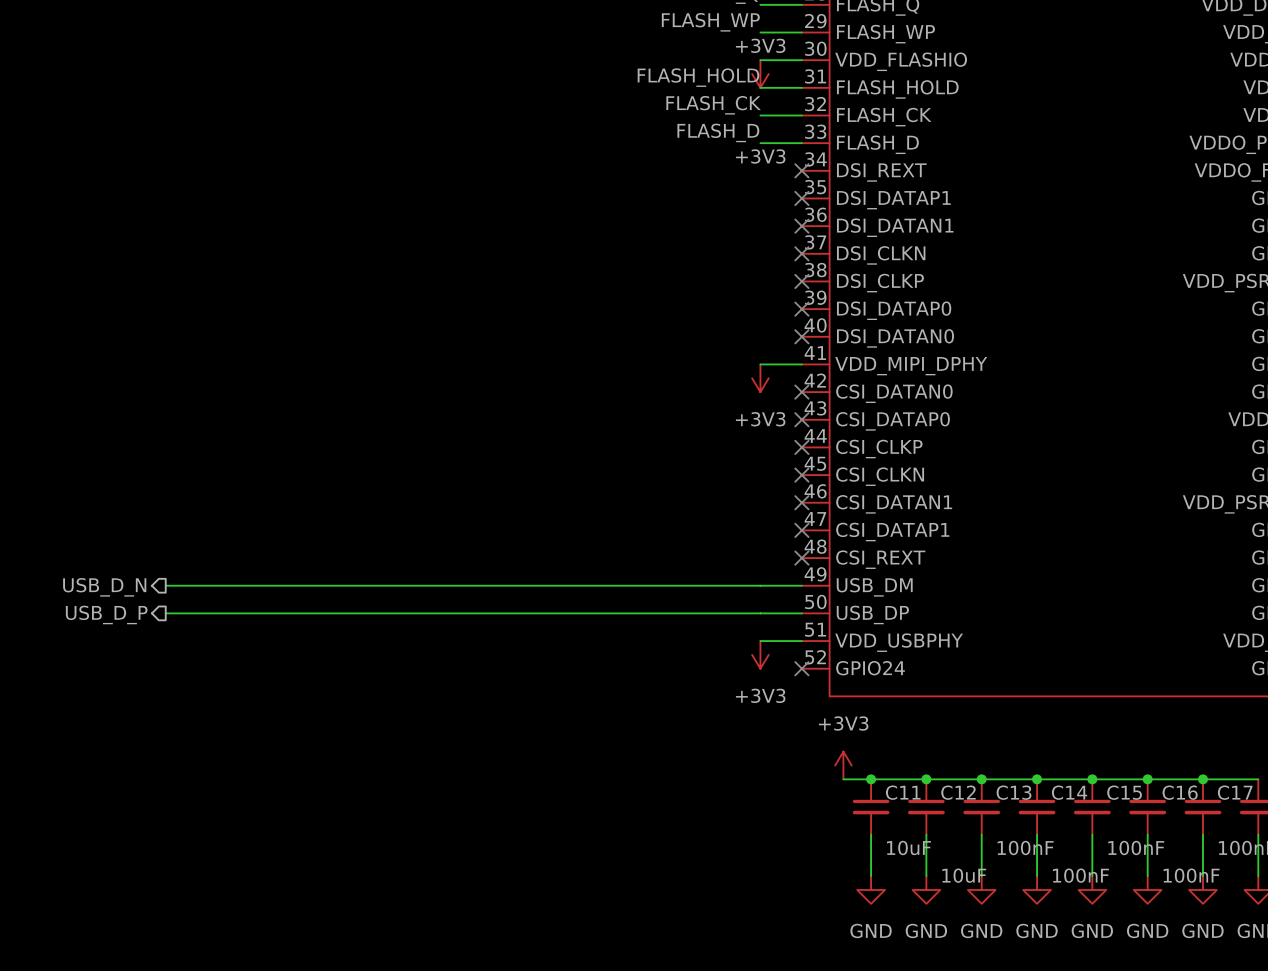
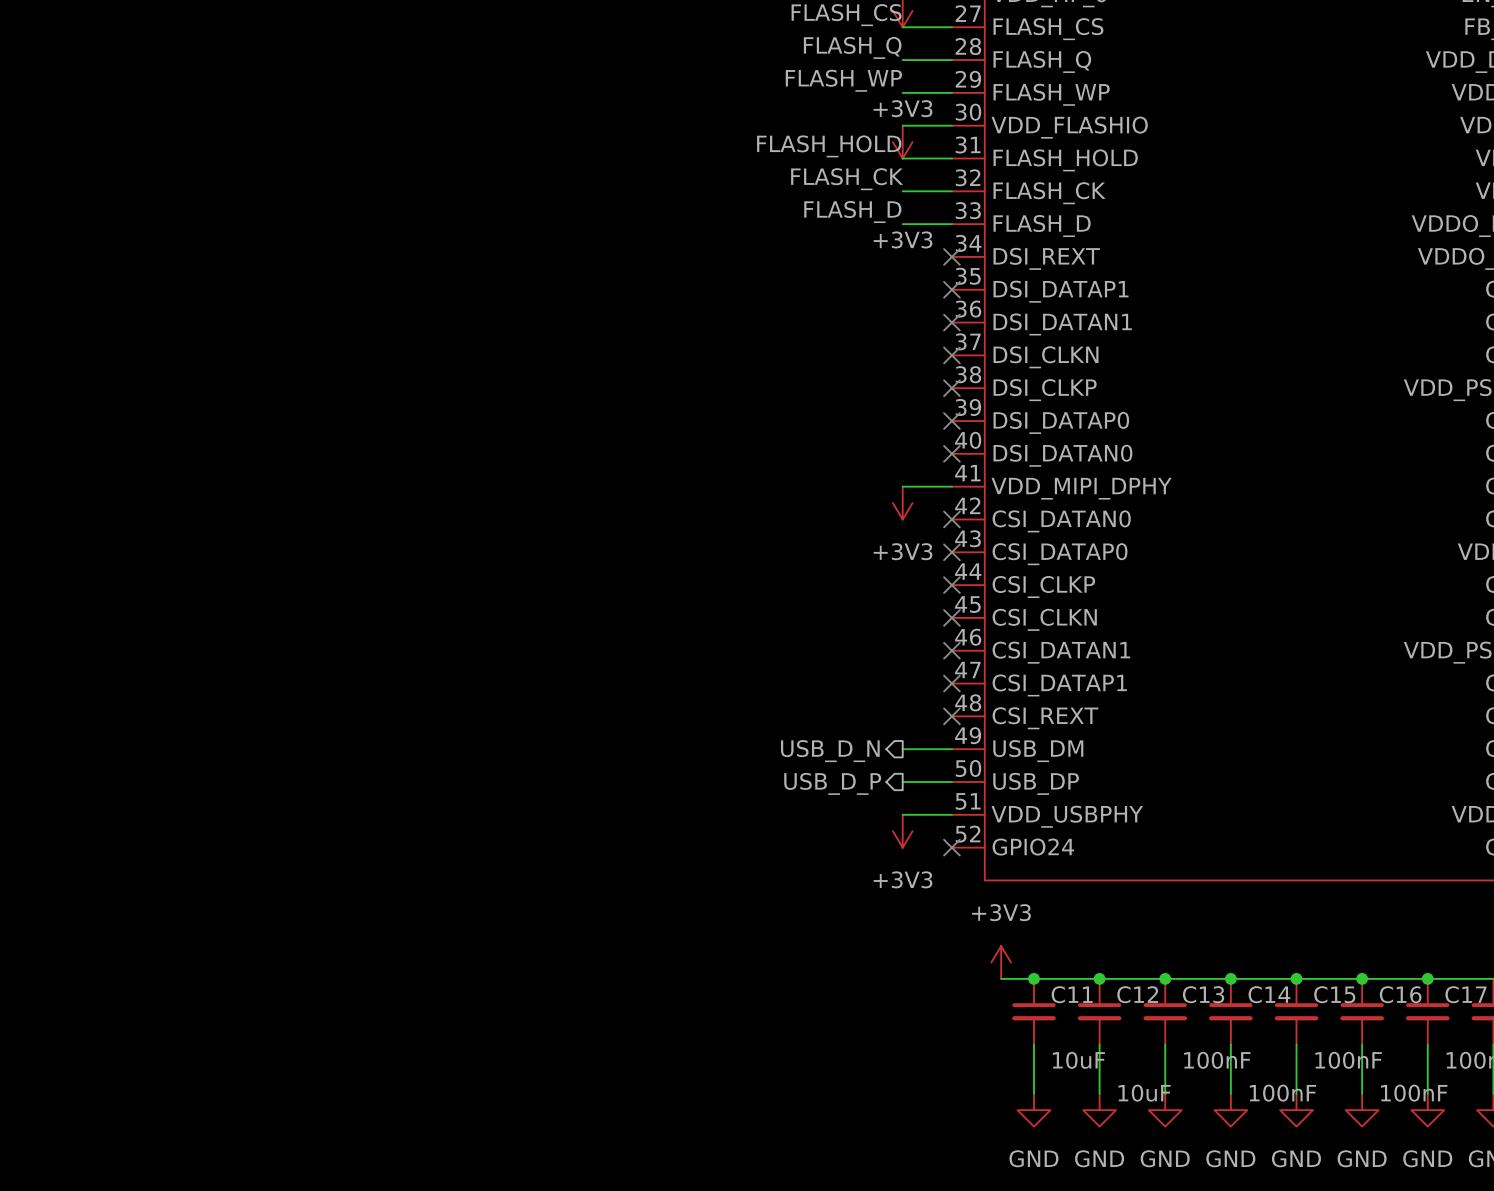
wire: (165, 585) (760, 585) -> none
hierarchical label: USB_D_N (104, 587) -> none
hierarchical label: none -> USB_D_N (830, 751)
wire: (165, 613) (760, 613) -> none
hierarchical label: USB_D_P (106, 614) -> none
hierarchical label: none -> USB_D_P (832, 783)

